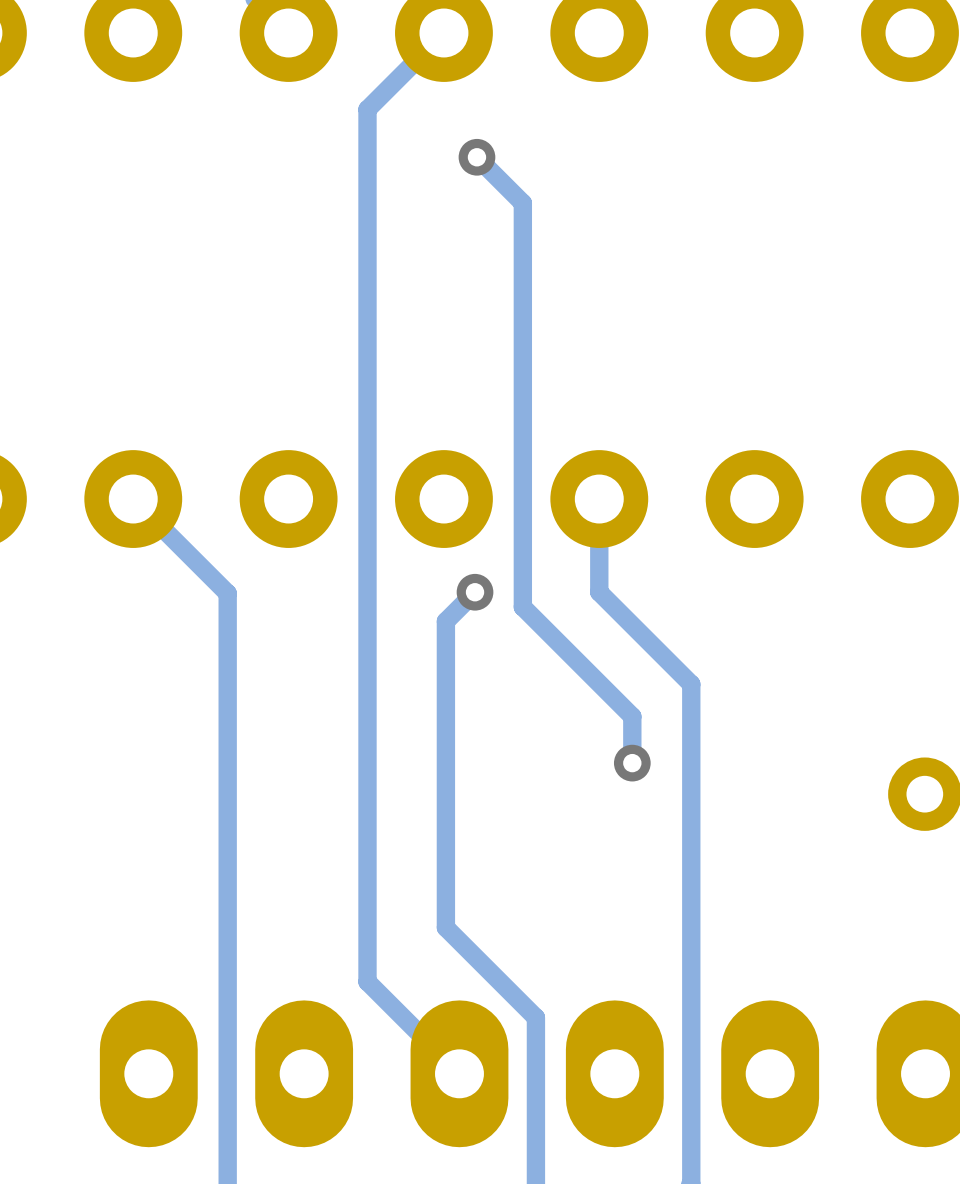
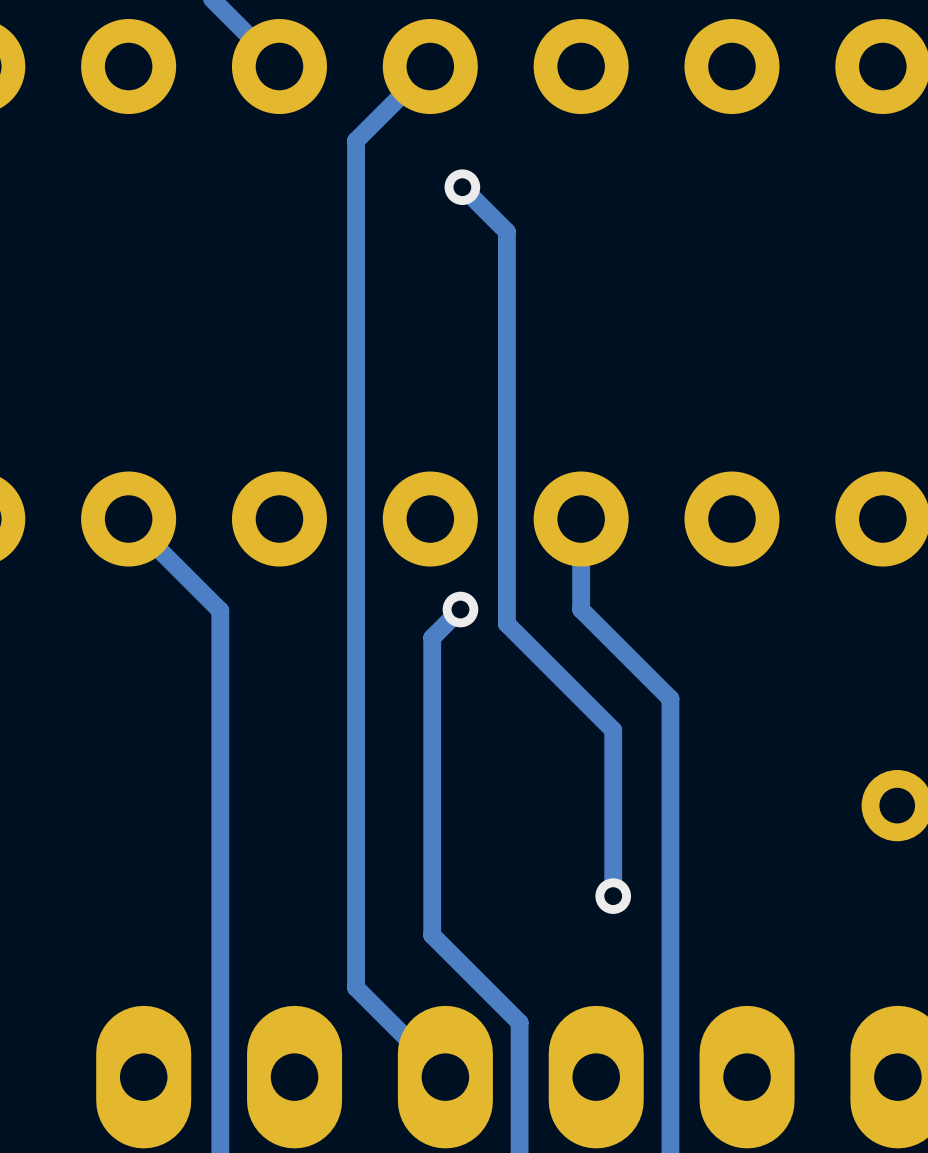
track: none -> (613, 775) (613, 896)
via position: (632, 763) -> (613, 896)

